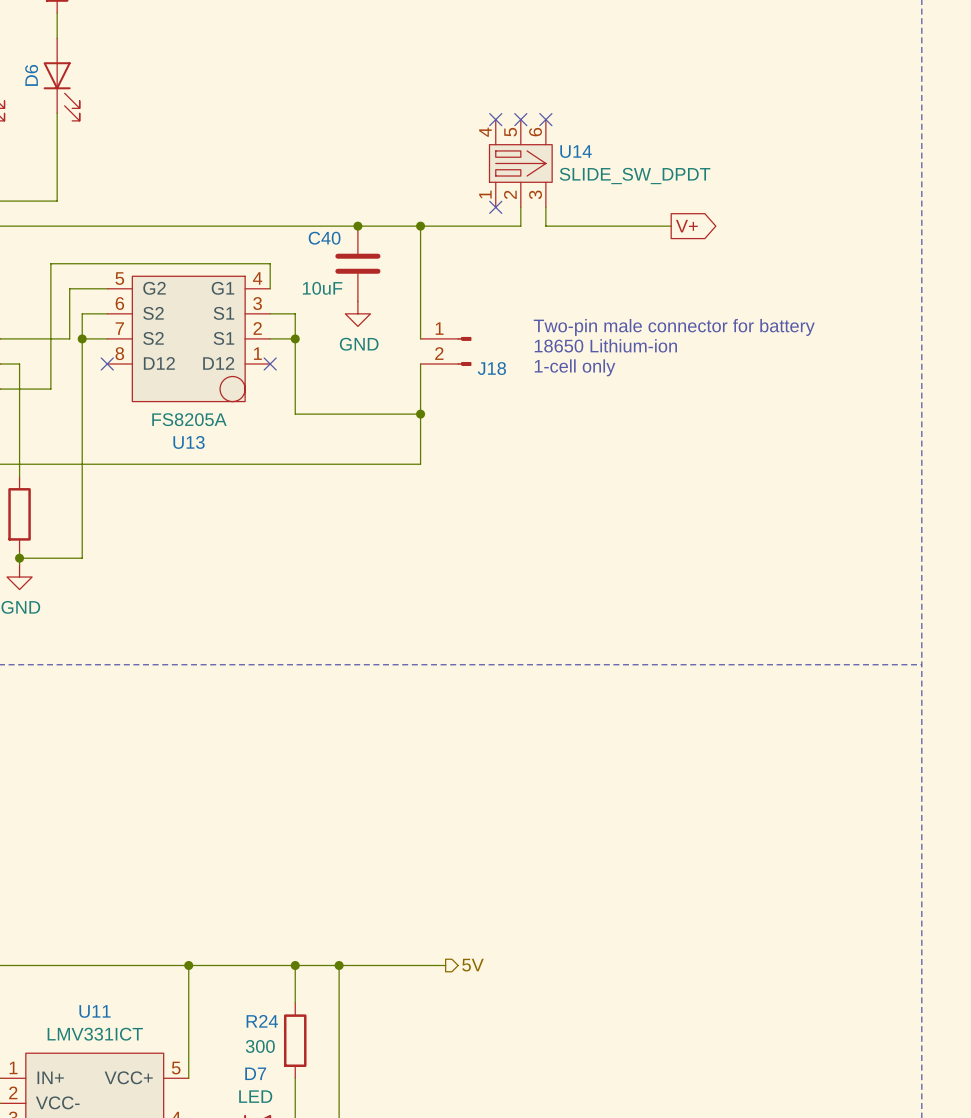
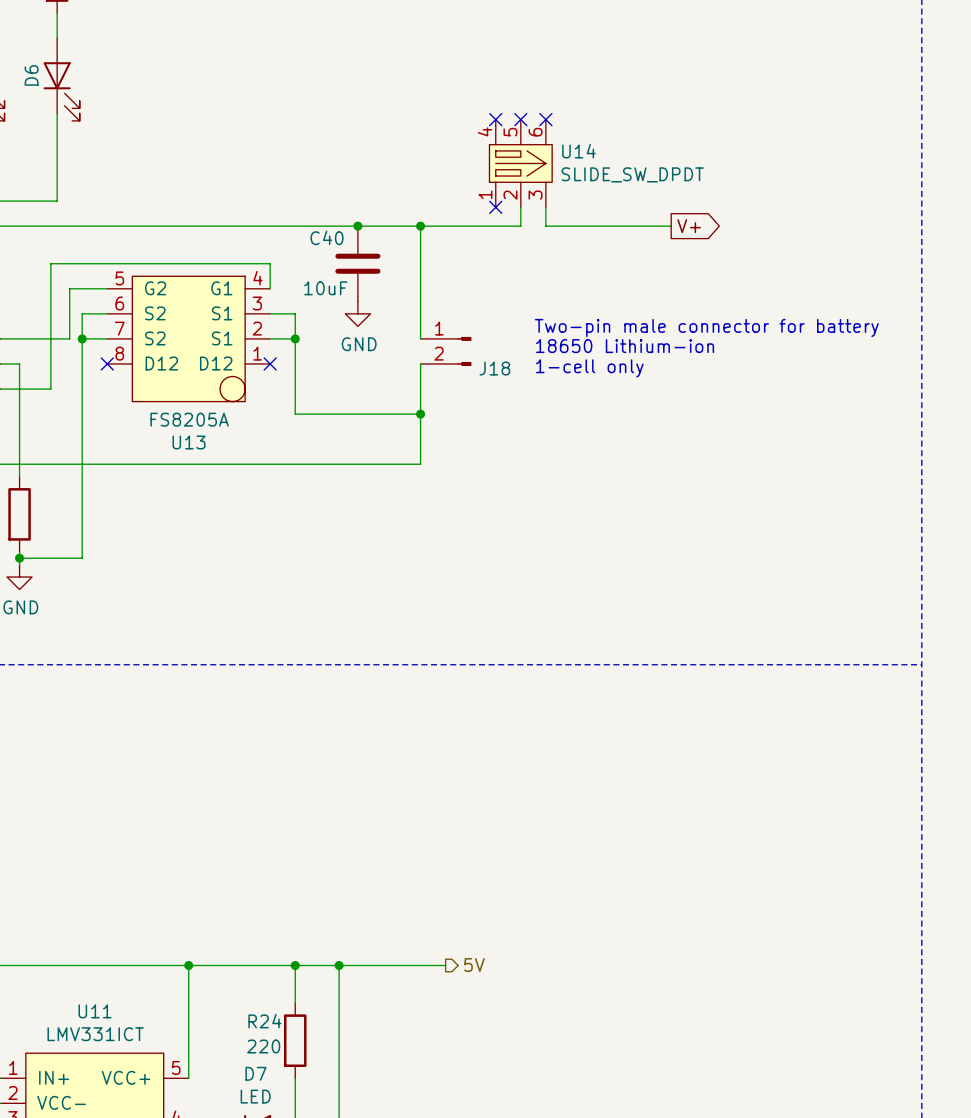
R24 value: 300 (260, 1046) -> 220 (263, 1046)

